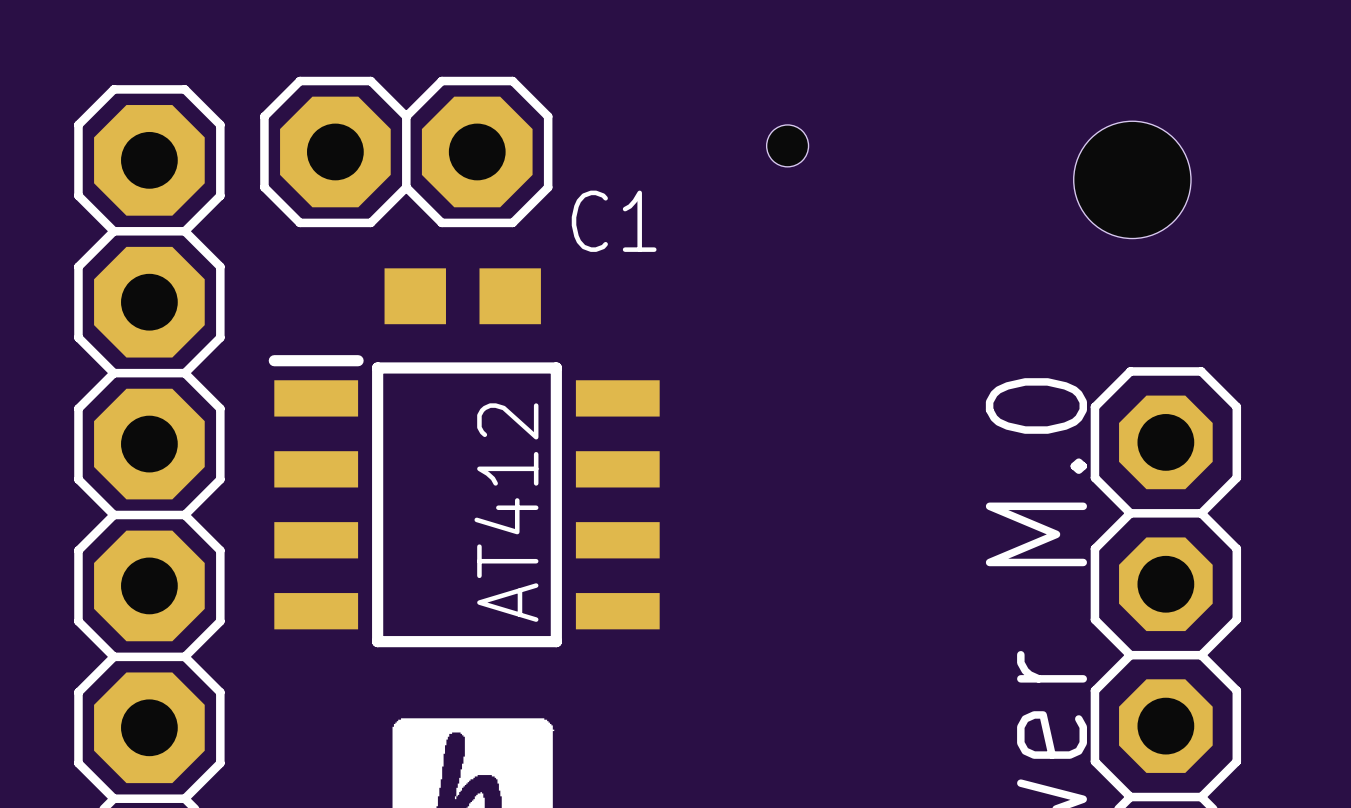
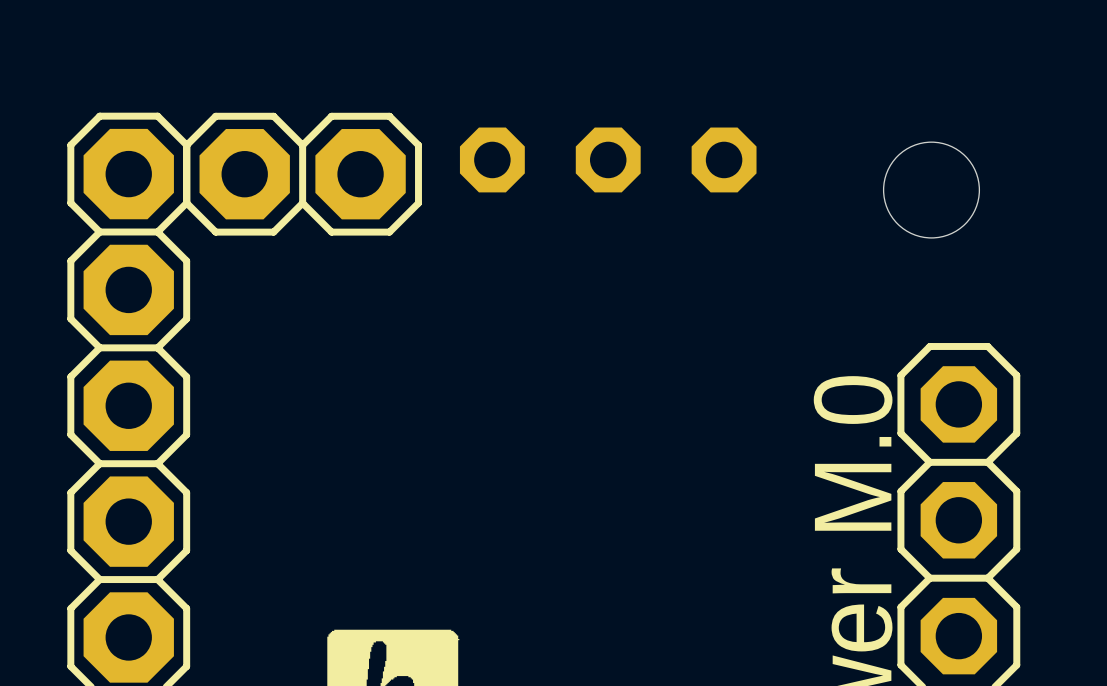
part footprint: [766, 124, 809, 167] -> [459, 127, 757, 193]
part position: (406, 151) -> (302, 174)
C1: (462, 296) -> none
AT412: (464, 501) -> none

